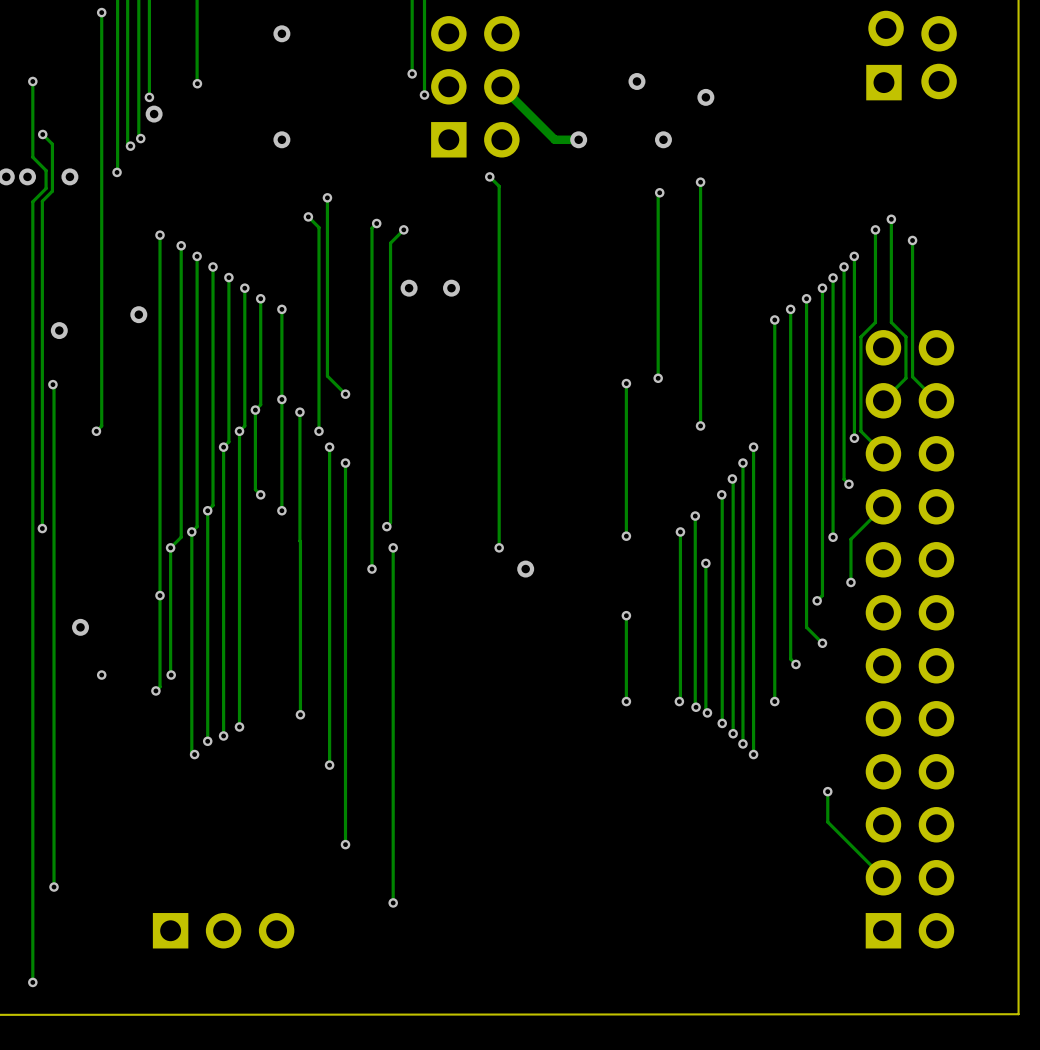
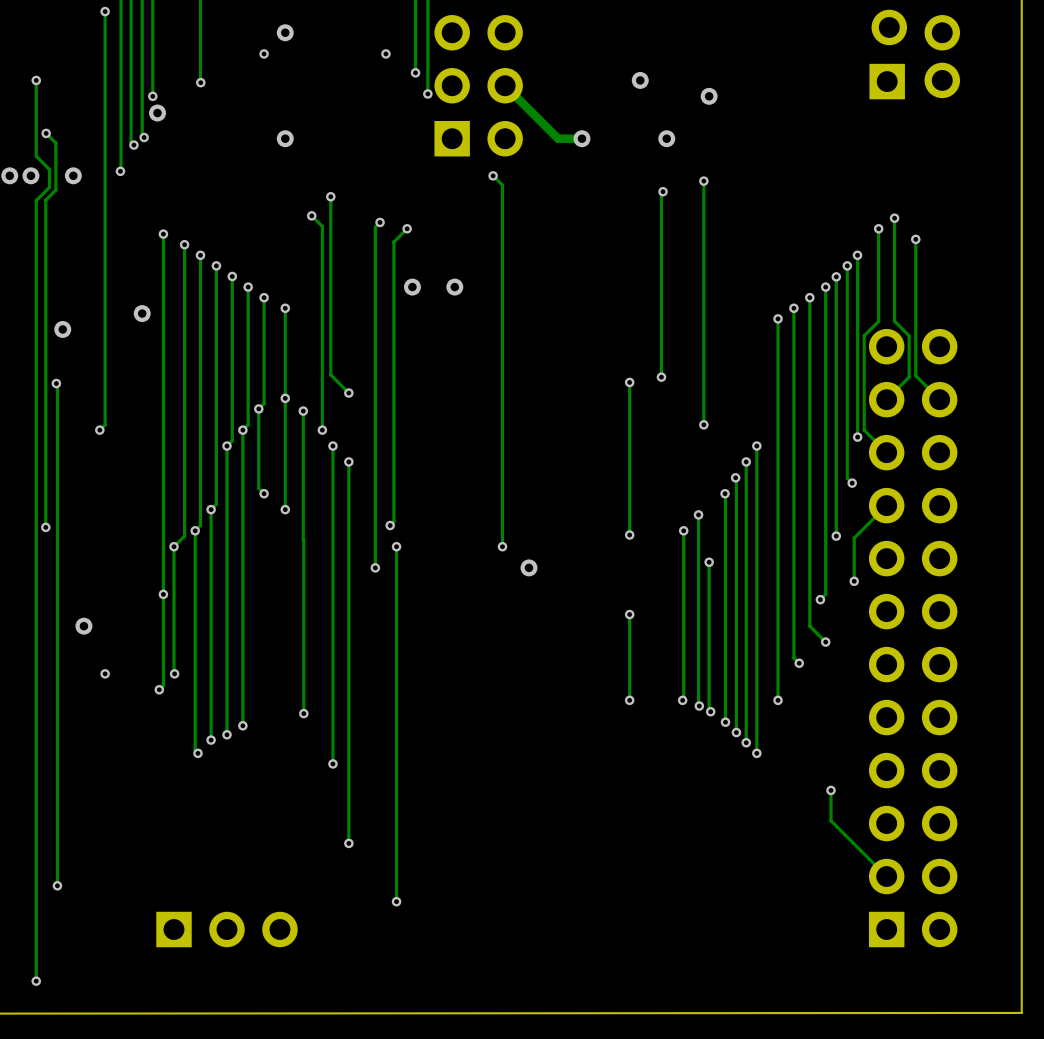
via: none -> (264, 53)
via: none -> (385, 53)

